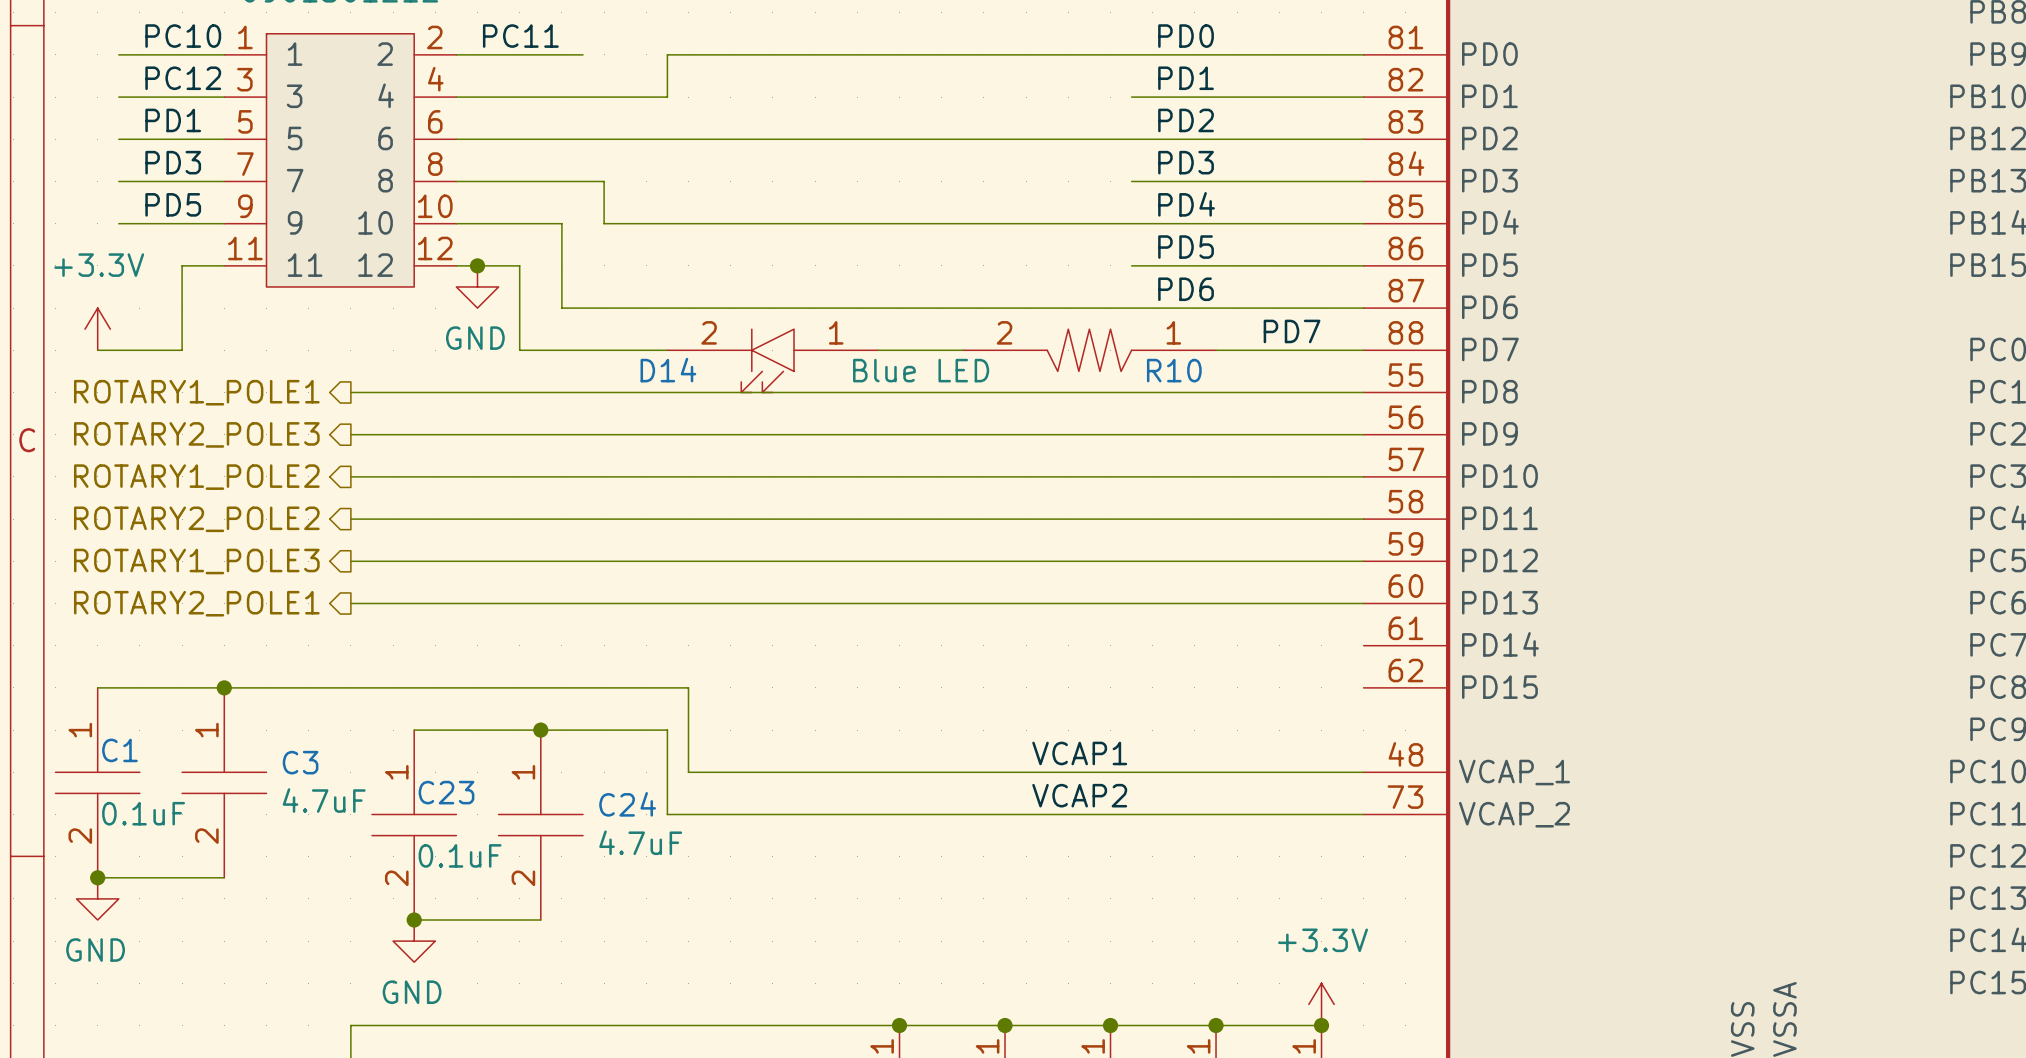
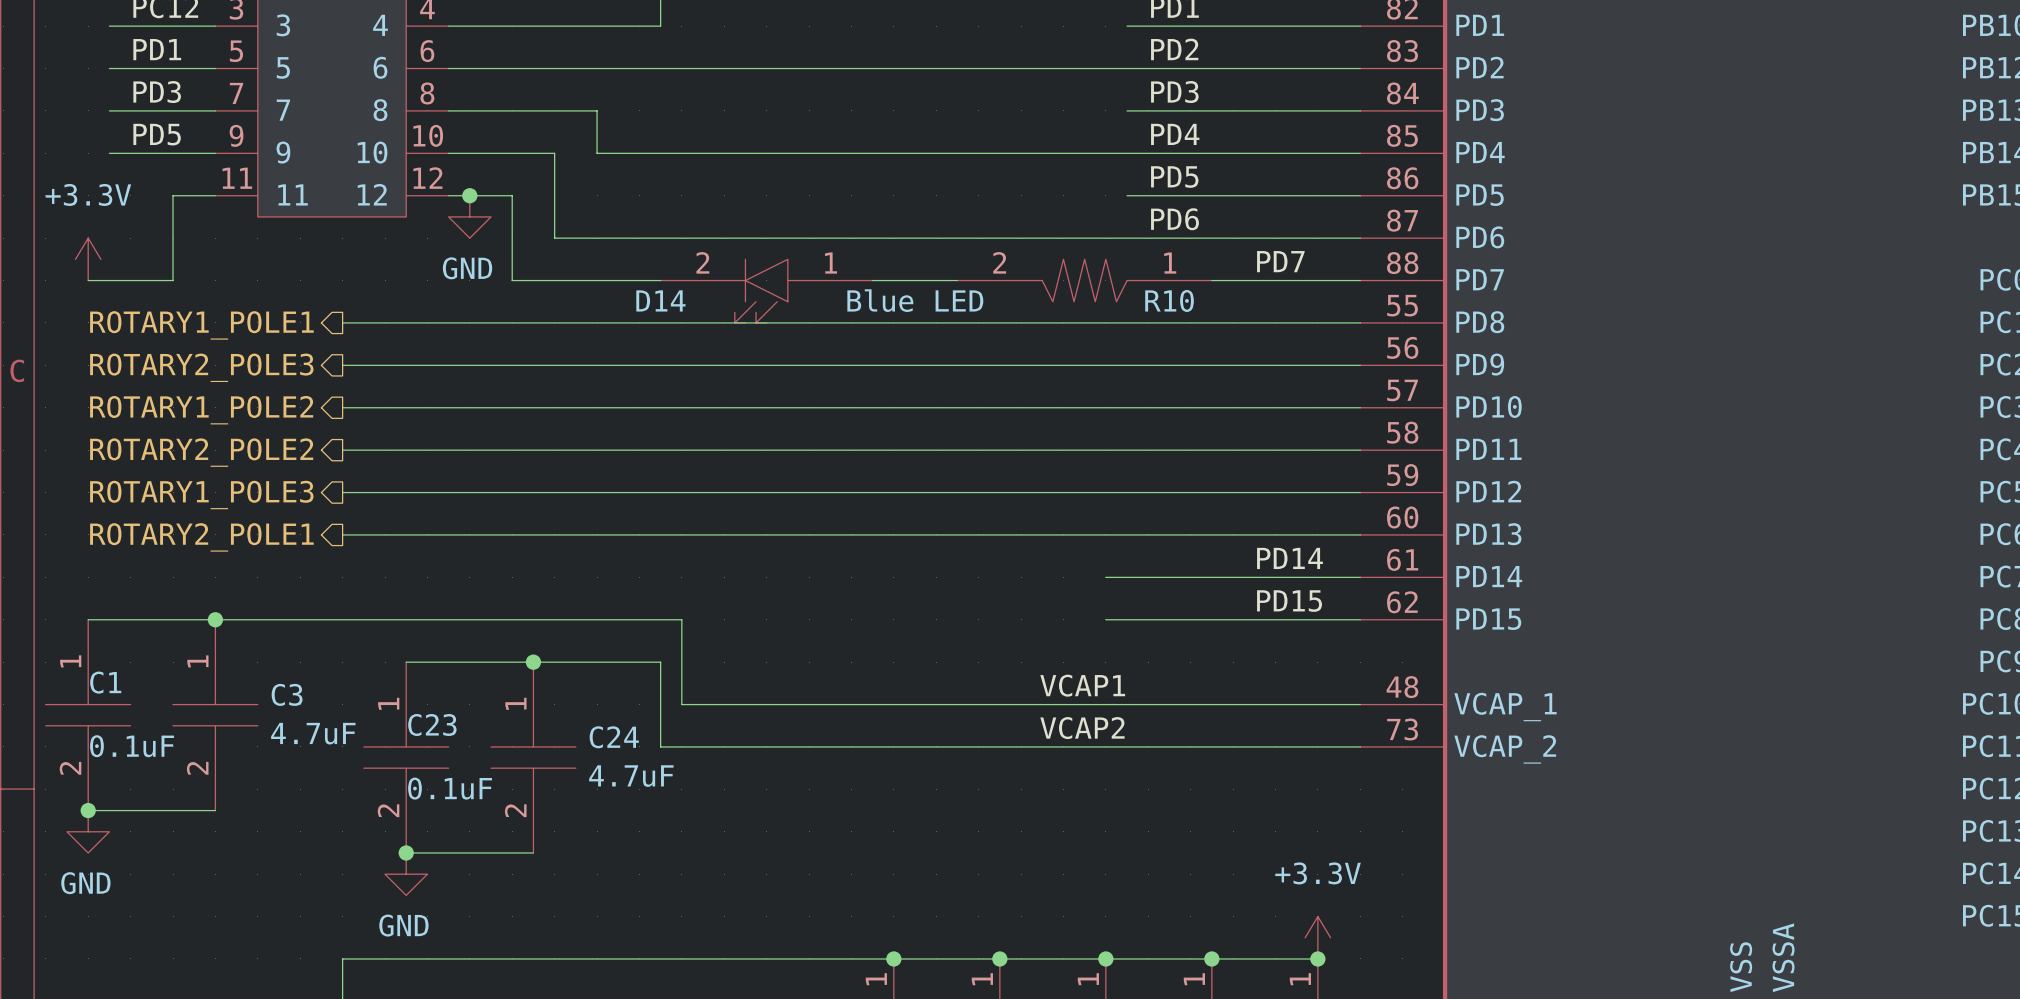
label: none -> PD14 (1289, 558)
wire: none -> (1105, 577) (1360, 577)
label: none -> PD15 (1289, 601)
wire: none -> (1105, 619) (1360, 619)

